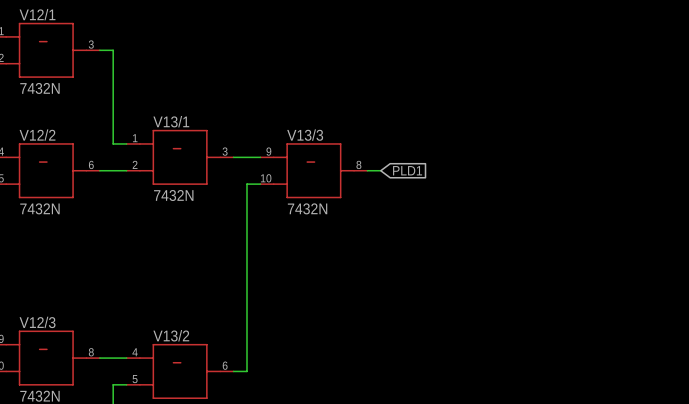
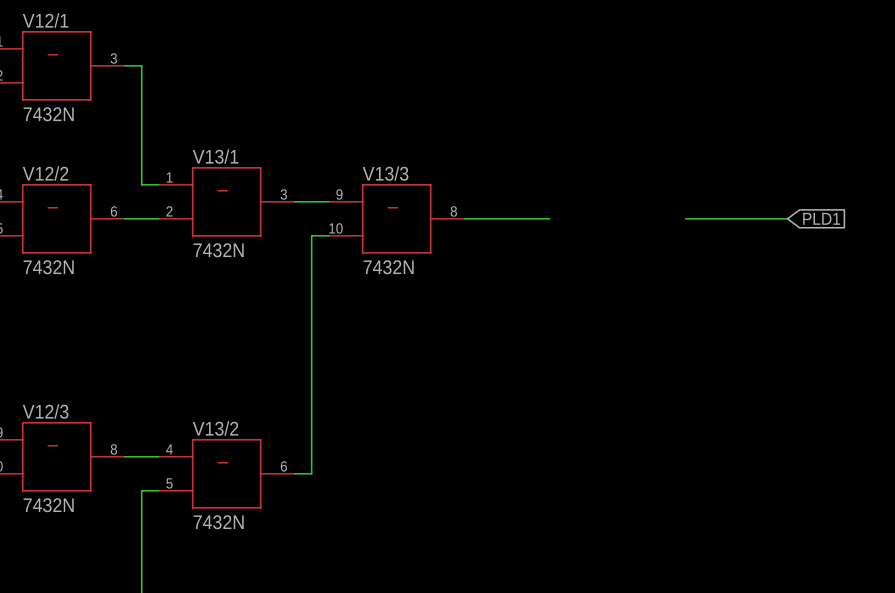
wire: none -> (481, 218) (549, 218)
global label: PLD1 (407, 170) -> none
wire: none -> (685, 218) (787, 218)
global label: none -> PLD1 (821, 218)

